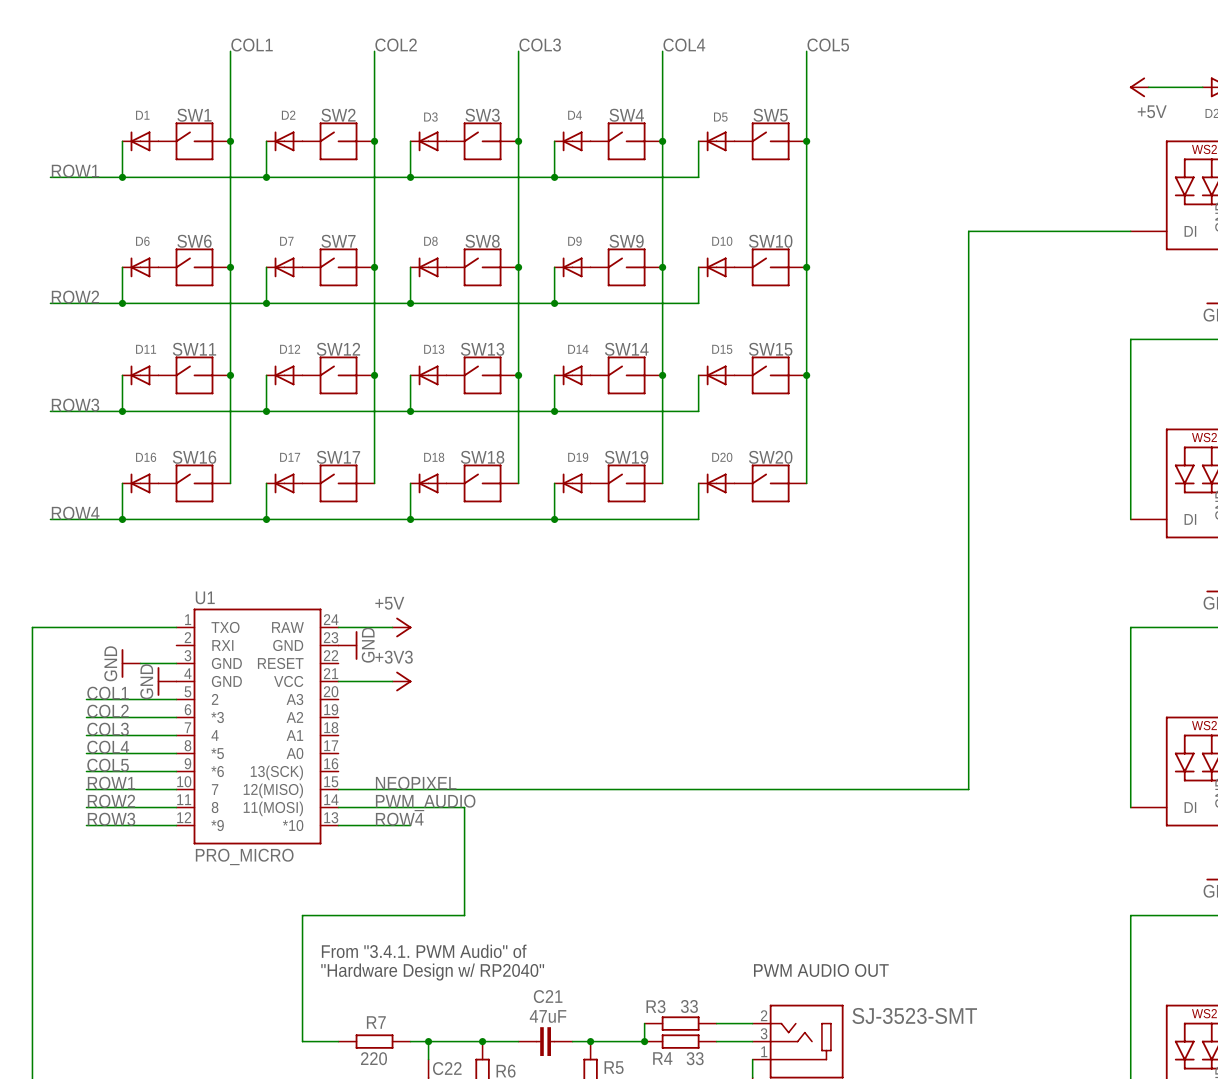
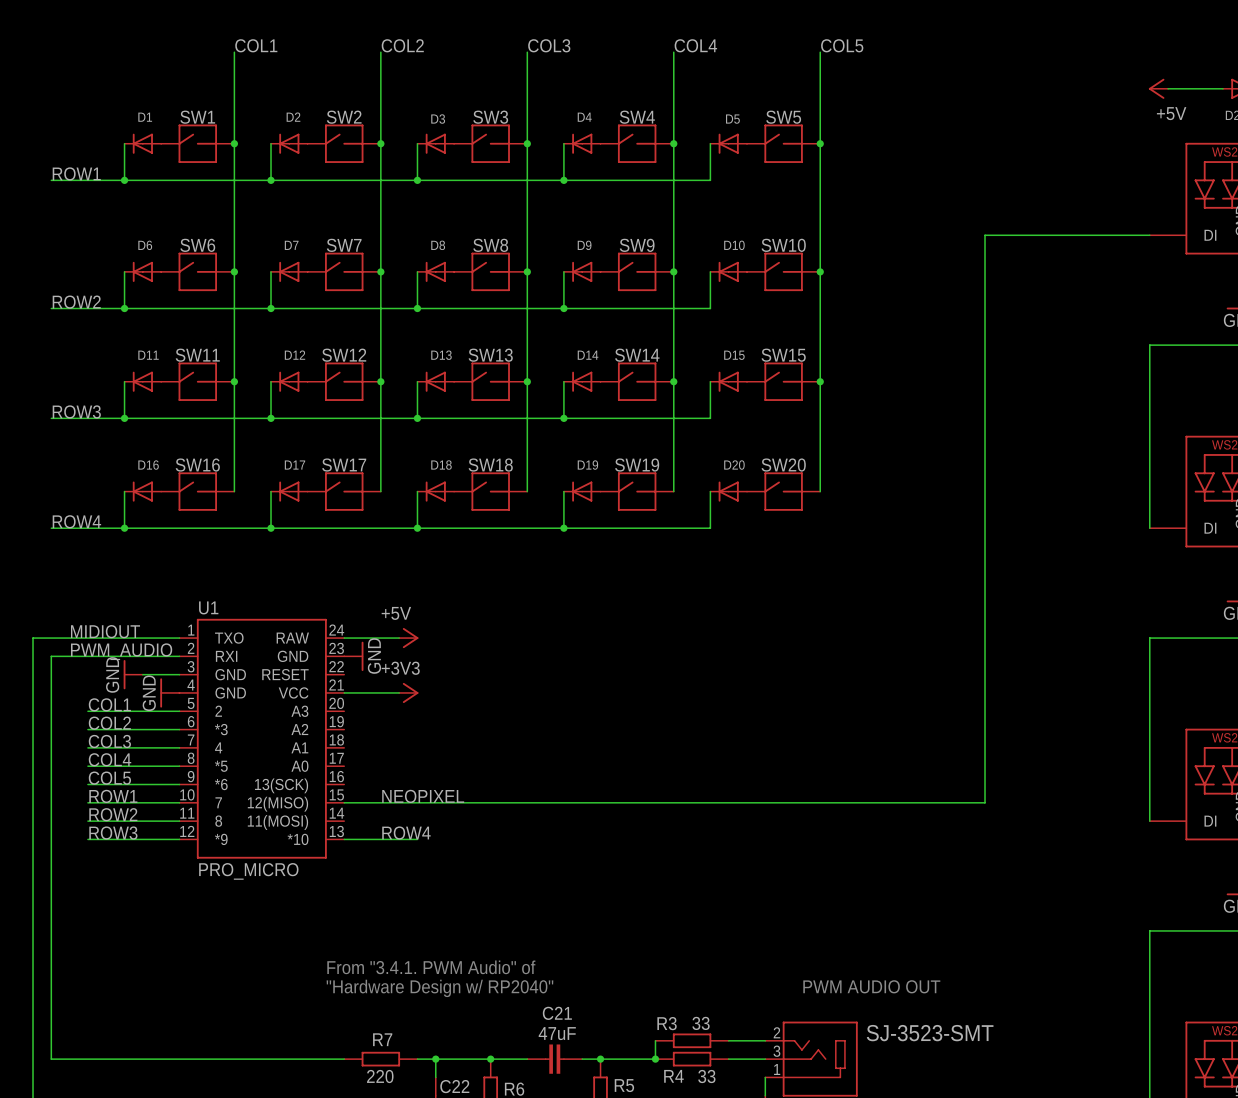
label: none -> MIDIOUT (105, 631)
label: none -> PWM_AUDIO (121, 651)
label: PWM_AUDIO (425, 802) -> none
wire: (338, 807) (464, 807) (464, 915) (302, 915) (302, 1041) -> (179, 656) (51, 656) (51, 1059) (307, 1059)
text position: PWM AUDIO OUT (821, 970) -> PWM AUDIO OUT (871, 986)

